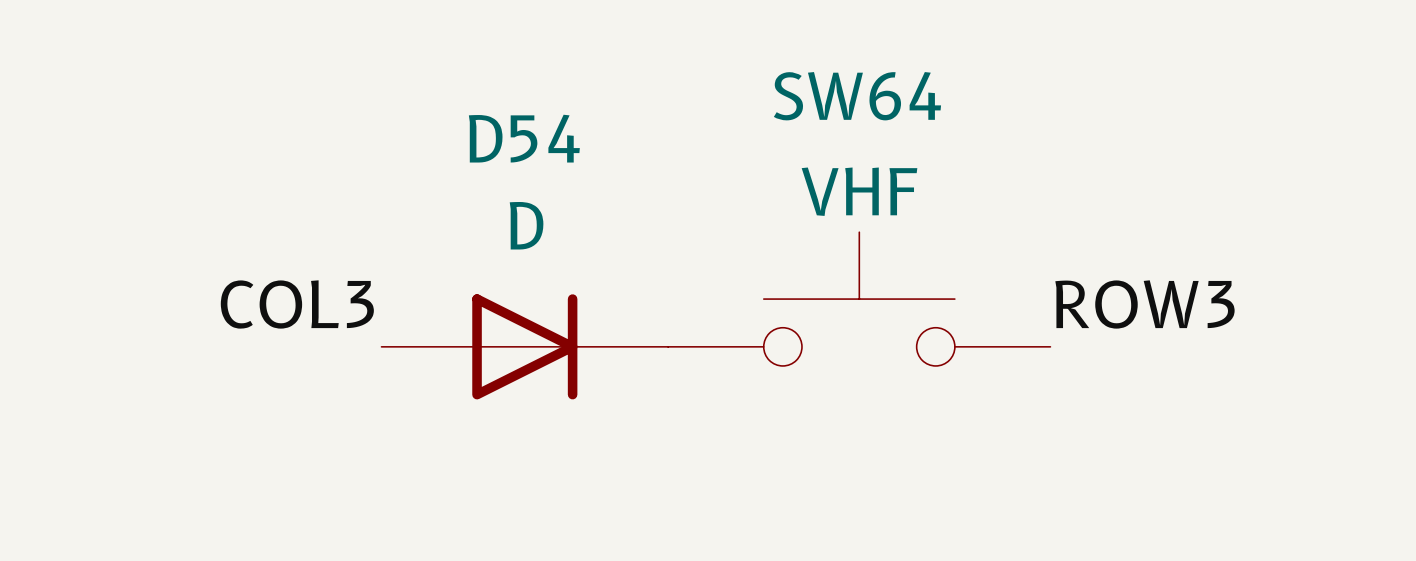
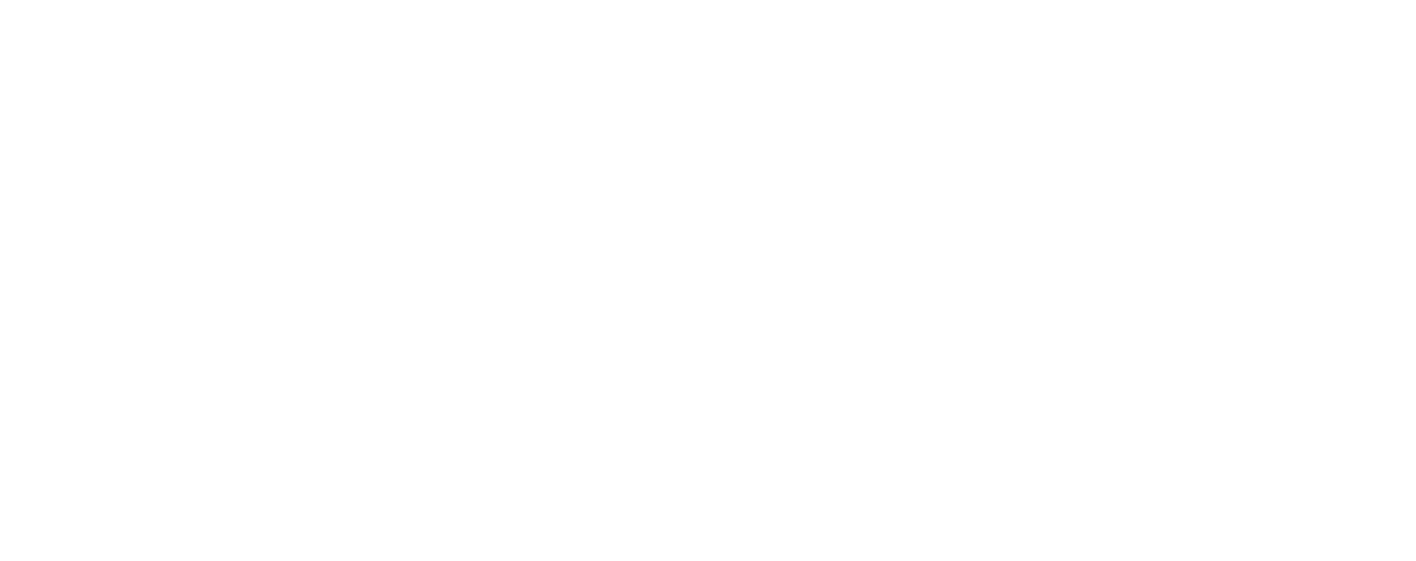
SW64: VHF (859, 299) -> none
label: COL3 (297, 304) -> none
label: ROW3 (1144, 304) -> none
D54: D (524, 346) -> none

